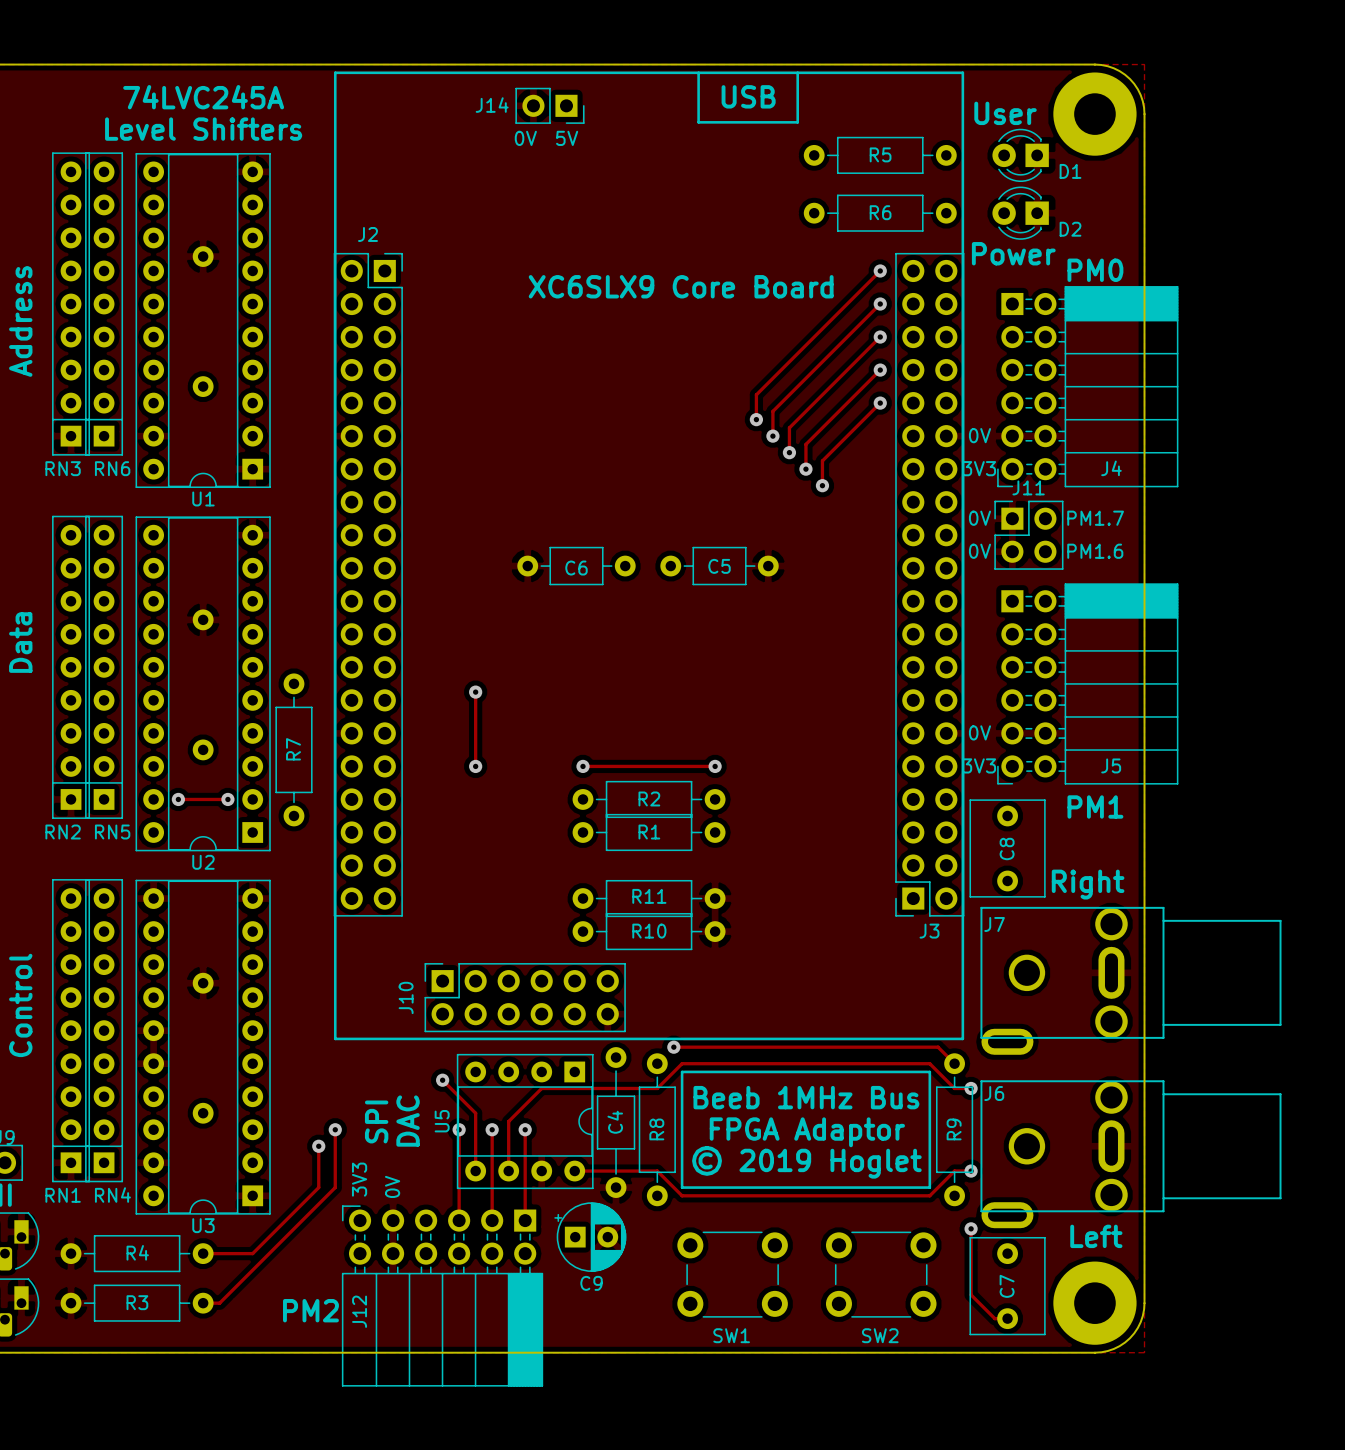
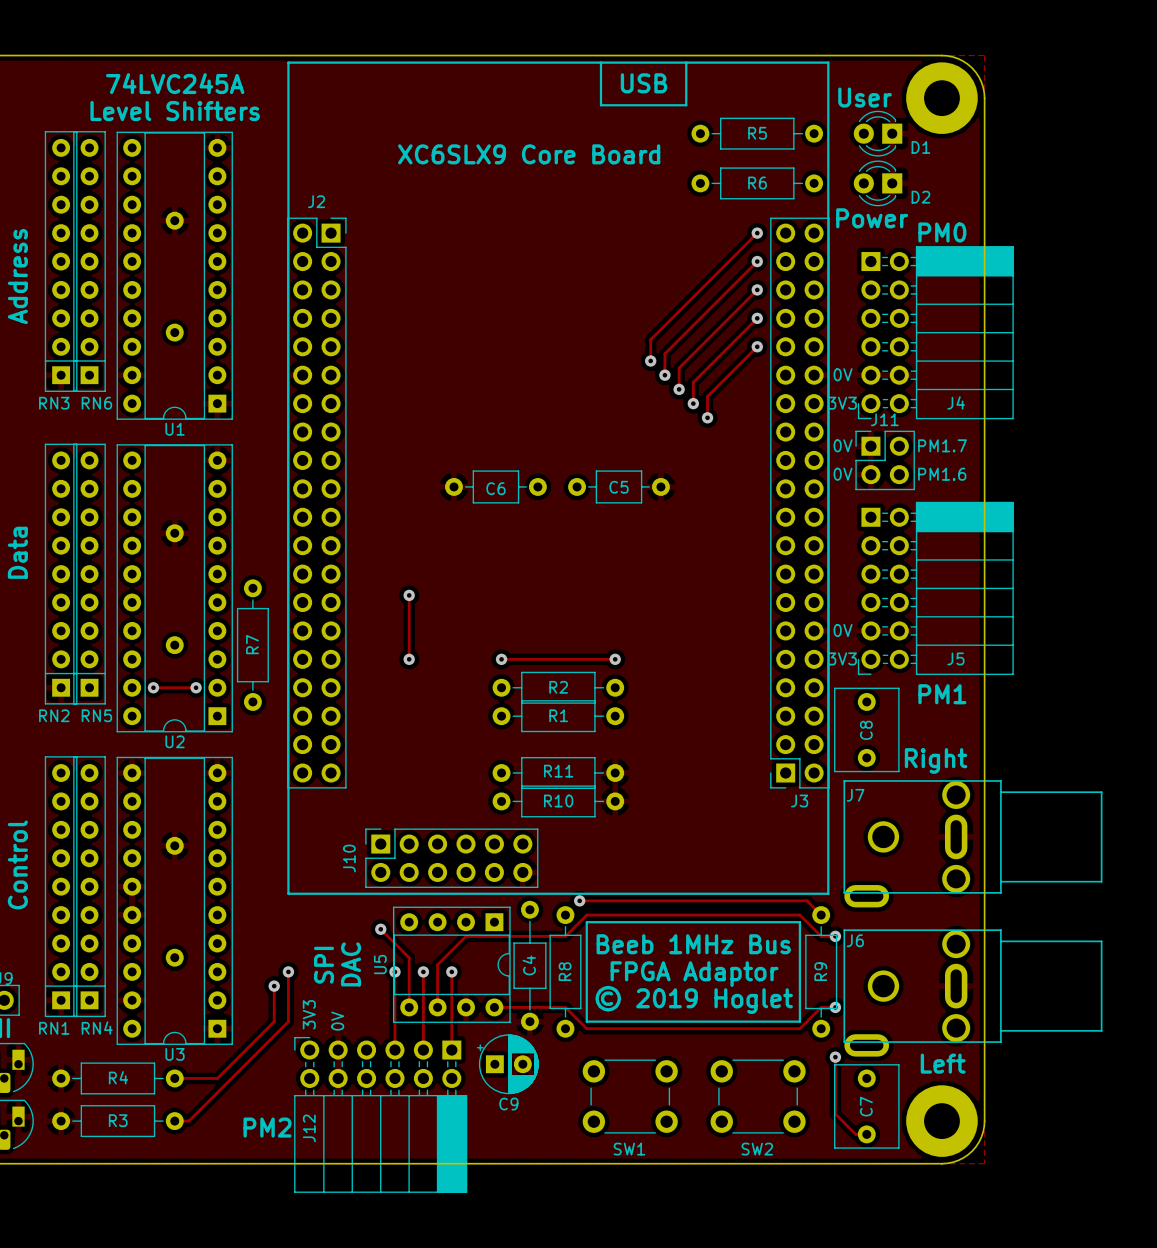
J14: (549, 105) -> none
text: 0V (525, 138) -> none
text: 5V (567, 138) -> none
text position: XC6SLX9 Core Board (681, 286) -> XC6SLX9 Core Board (529, 154)

